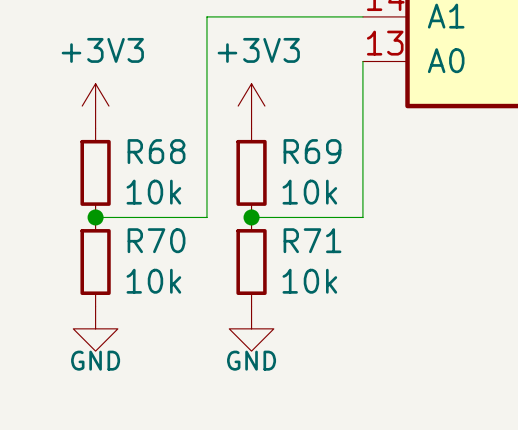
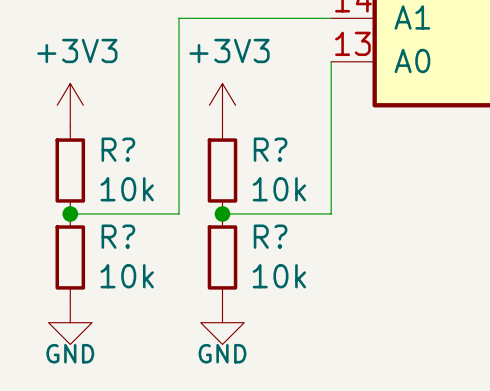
R68 name: R68 (156, 151) -> R? (118, 149)
R69 name: R69 (312, 151) -> R? (270, 149)
R70 name: R70 (156, 240) -> R? (118, 236)
R71 name: R71 (312, 240) -> R? (270, 236)

